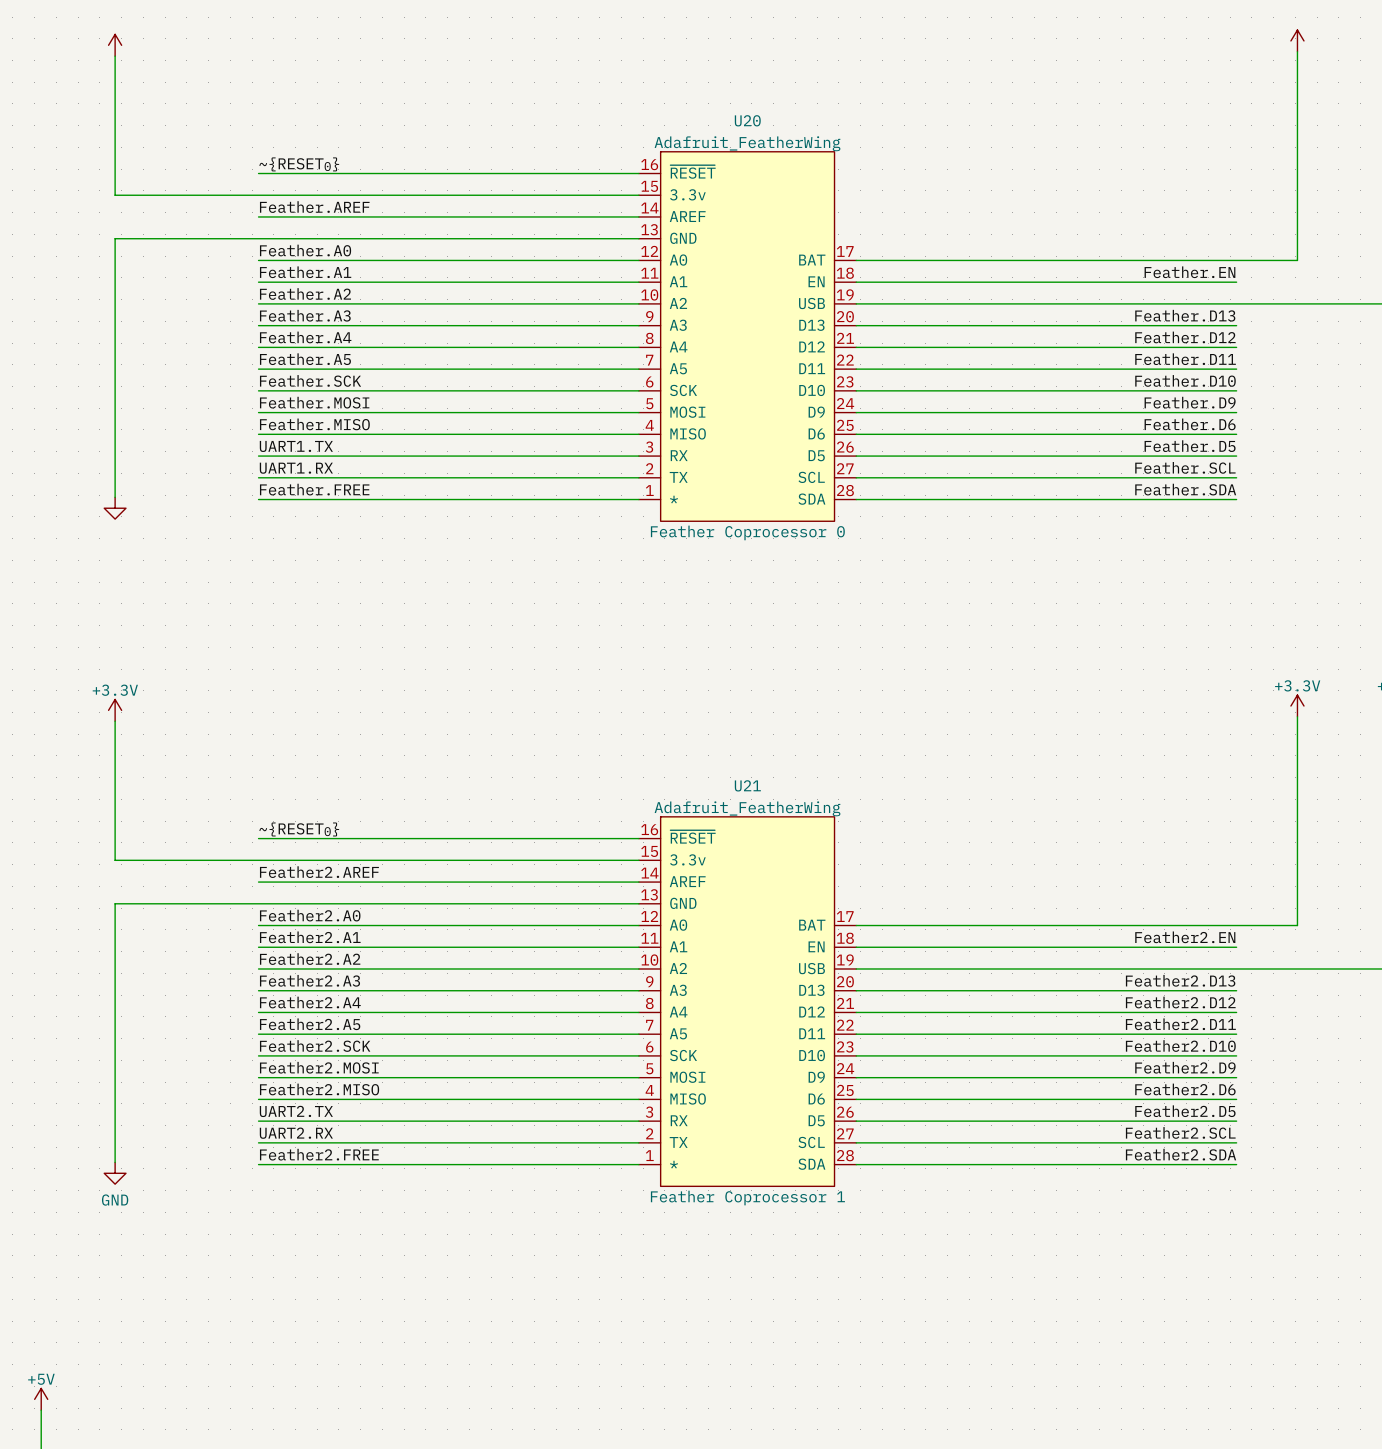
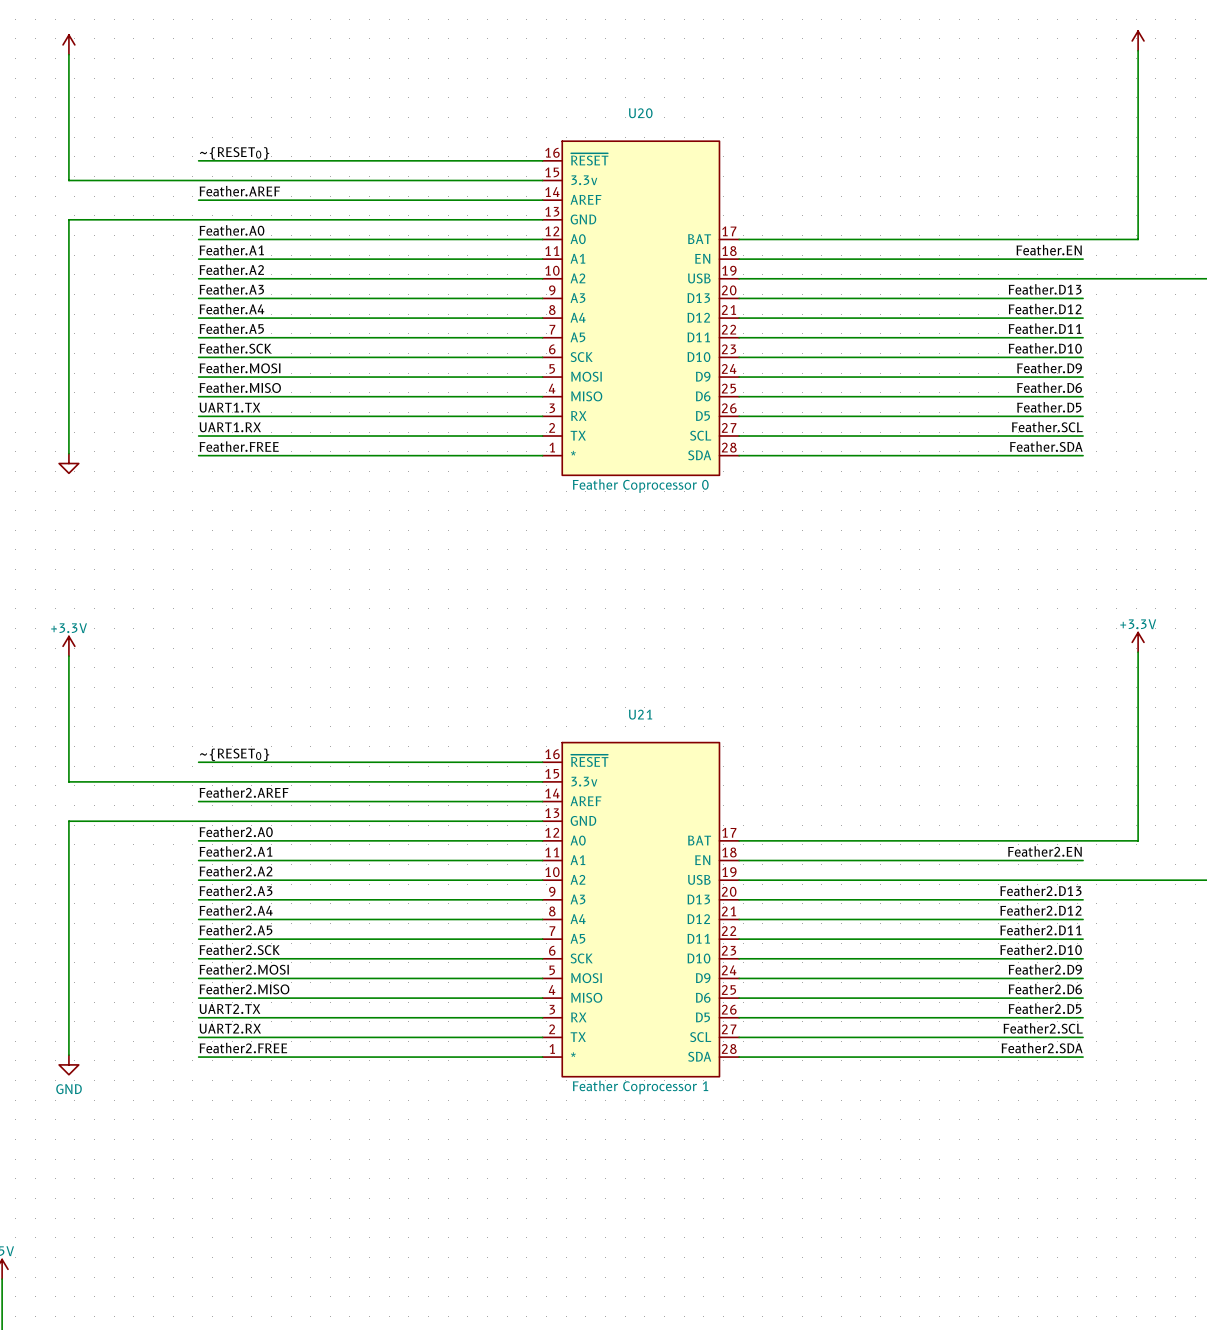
U20 value: Adafruit_FeatherWing (747, 143) -> none
U21 value: Adafruit_FeatherWing (747, 808) -> none

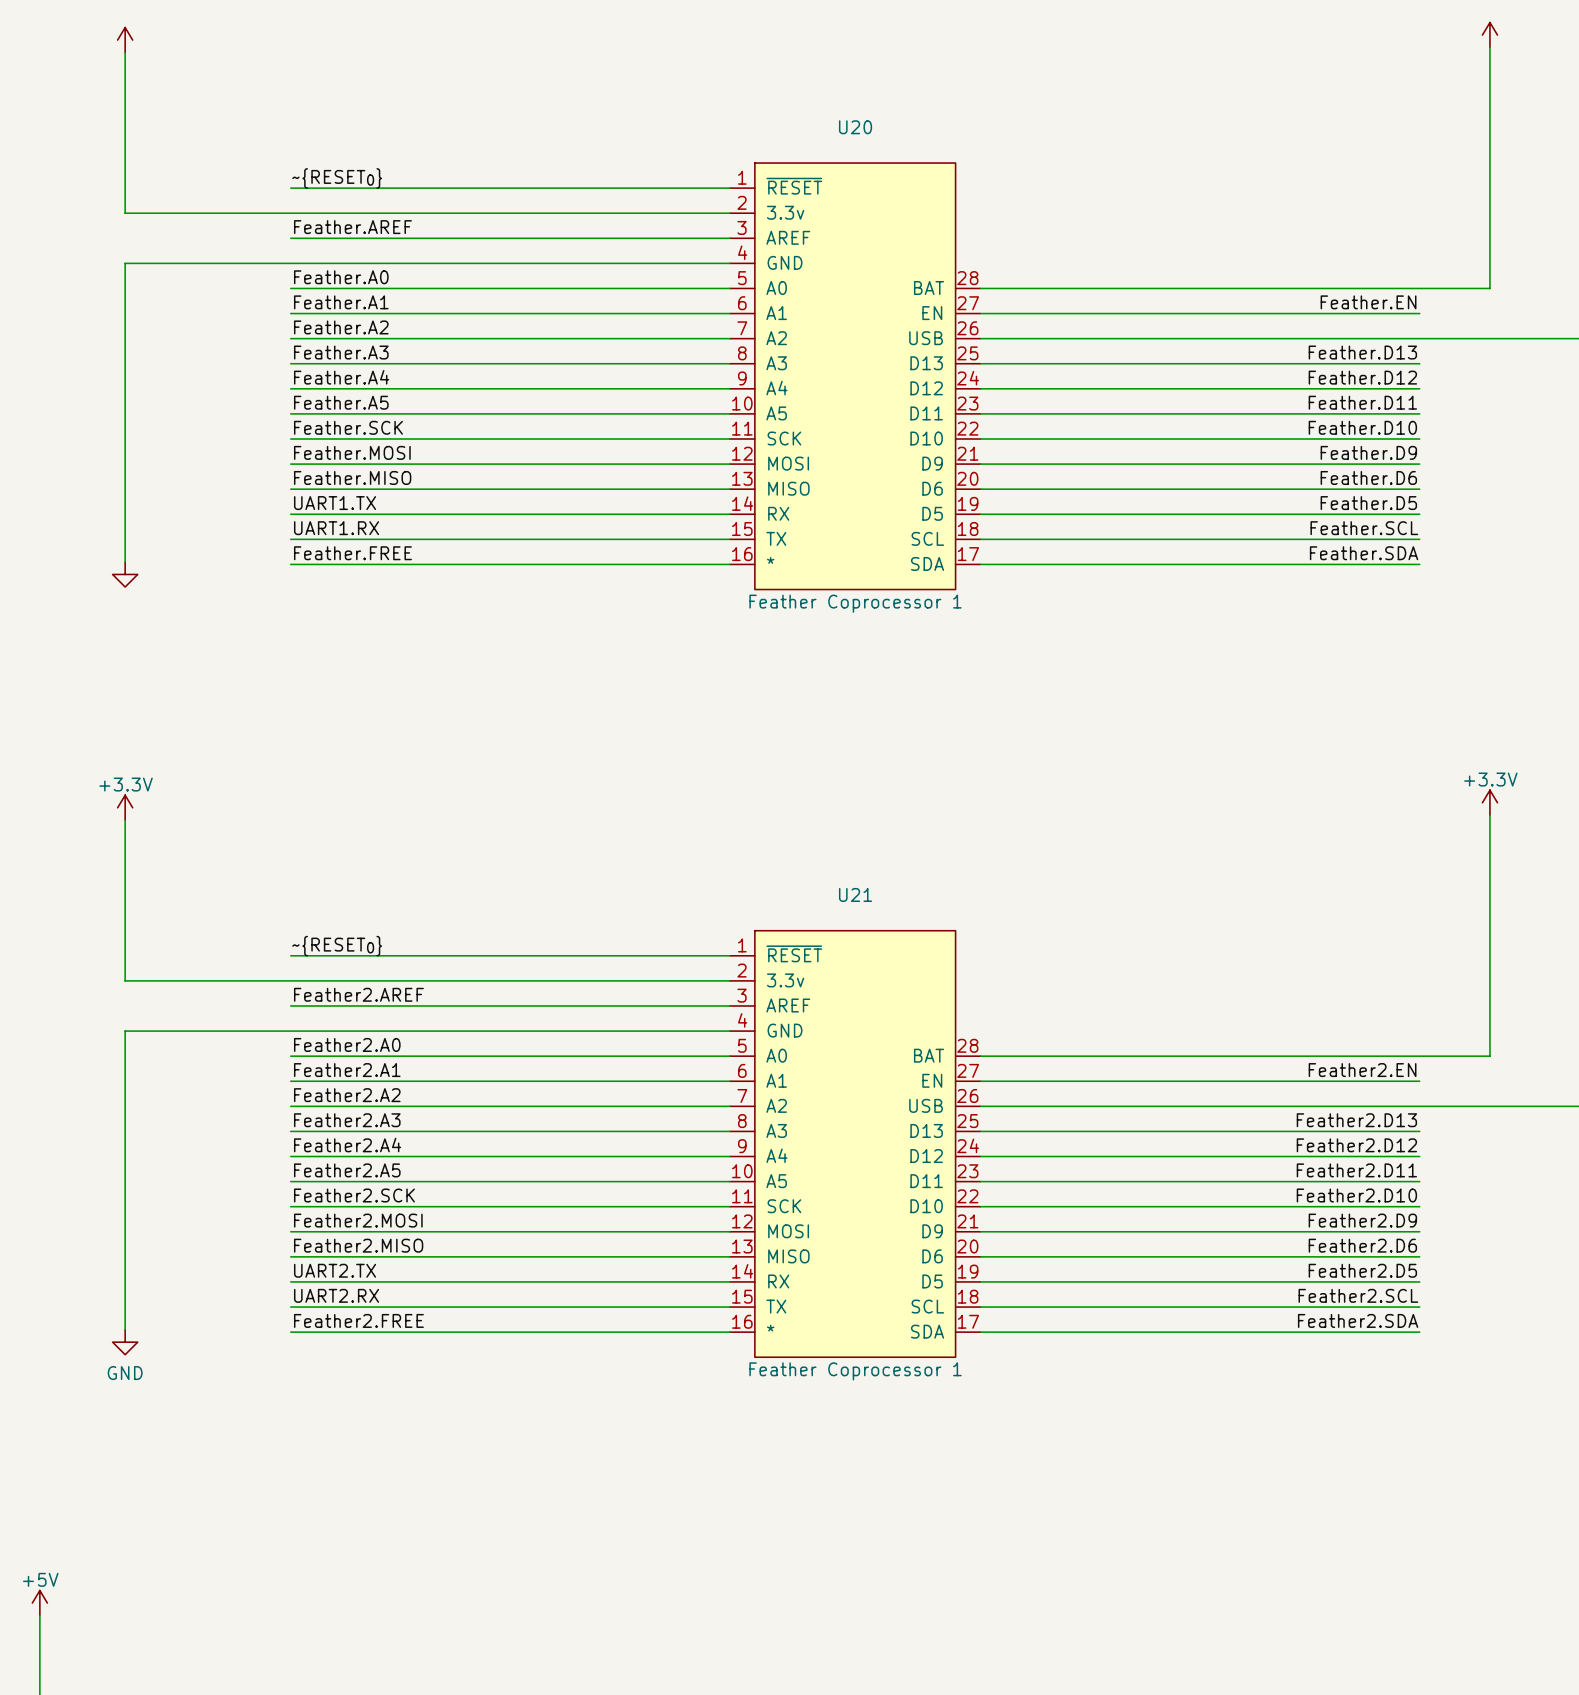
U20 symbol: [542, 141, 740, 476] -> [729, 163, 981, 590]
U20 text: Feather Coprocessor 0 (640, 486) -> Feather Coprocessor 1 (855, 603)
U21 symbol: [542, 742, 740, 1077] -> [729, 930, 981, 1358]

